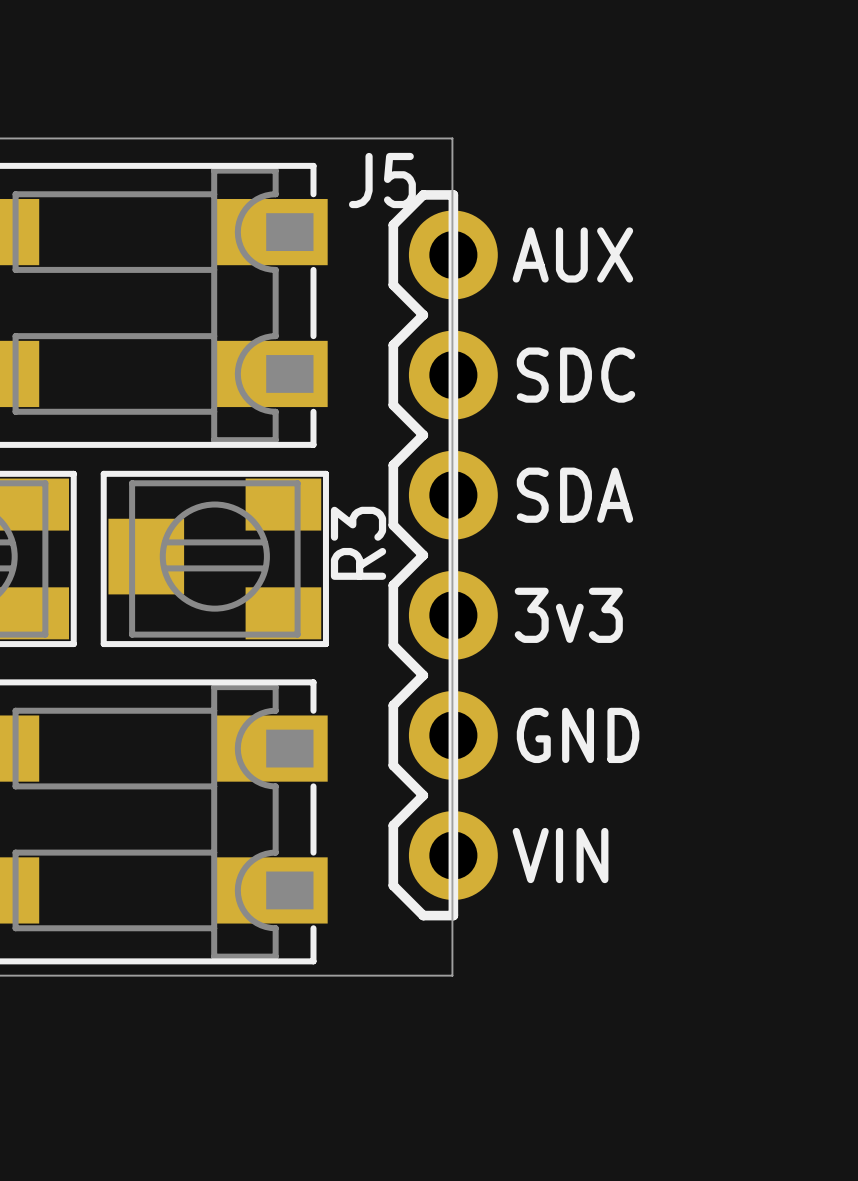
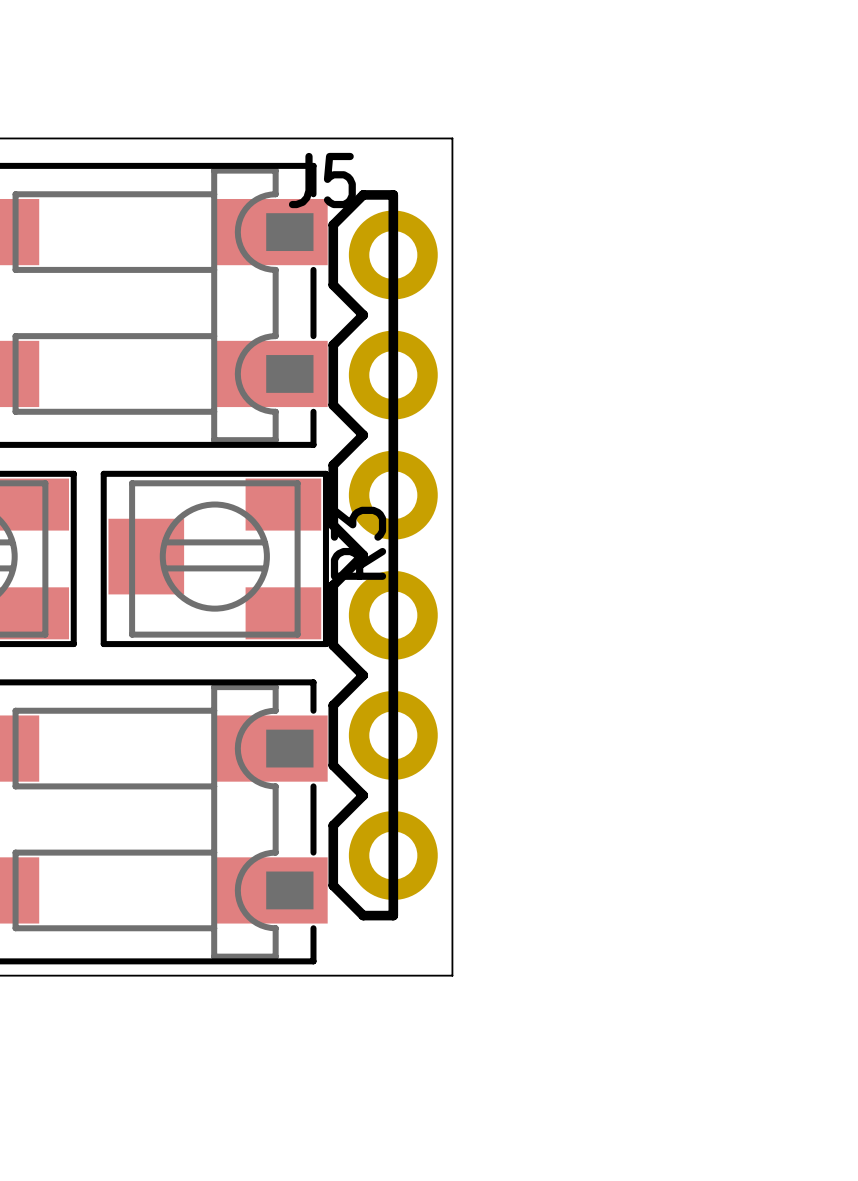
J5 text: AUX (572, 254) -> none
J5 text: SDC (575, 375) -> none
J5 text: SDA (574, 495) -> none
J5 position: (443, 555) -> (383, 555)
J5 text: 3v3 (568, 615) -> none
J5 text: GND (578, 735) -> none
J5 text: VIN (560, 855) -> none

